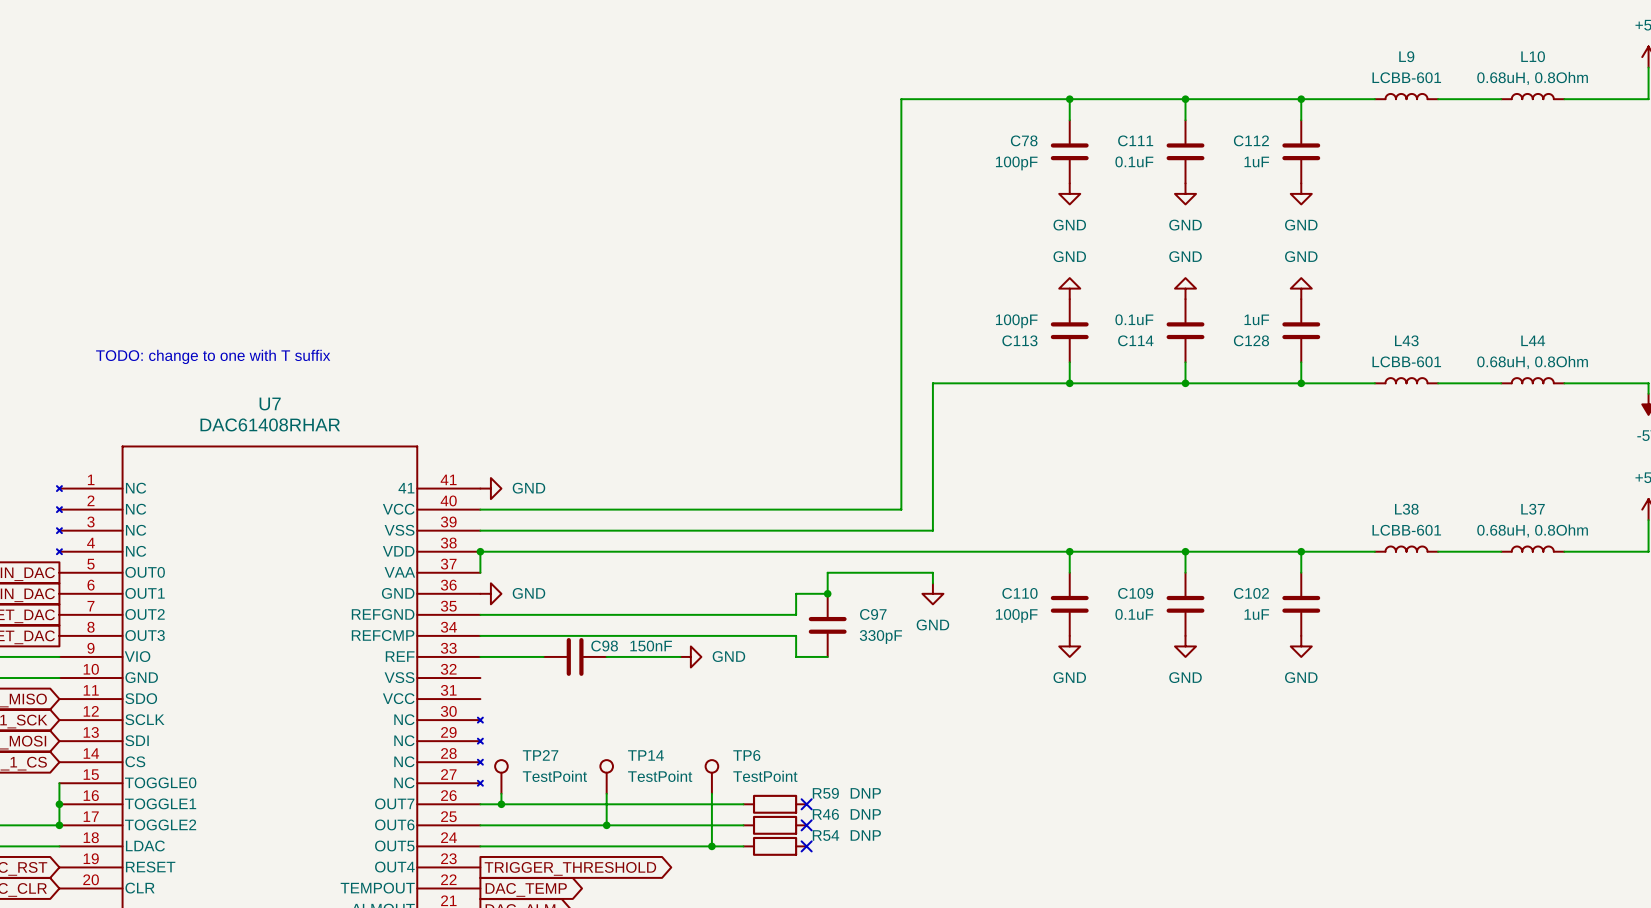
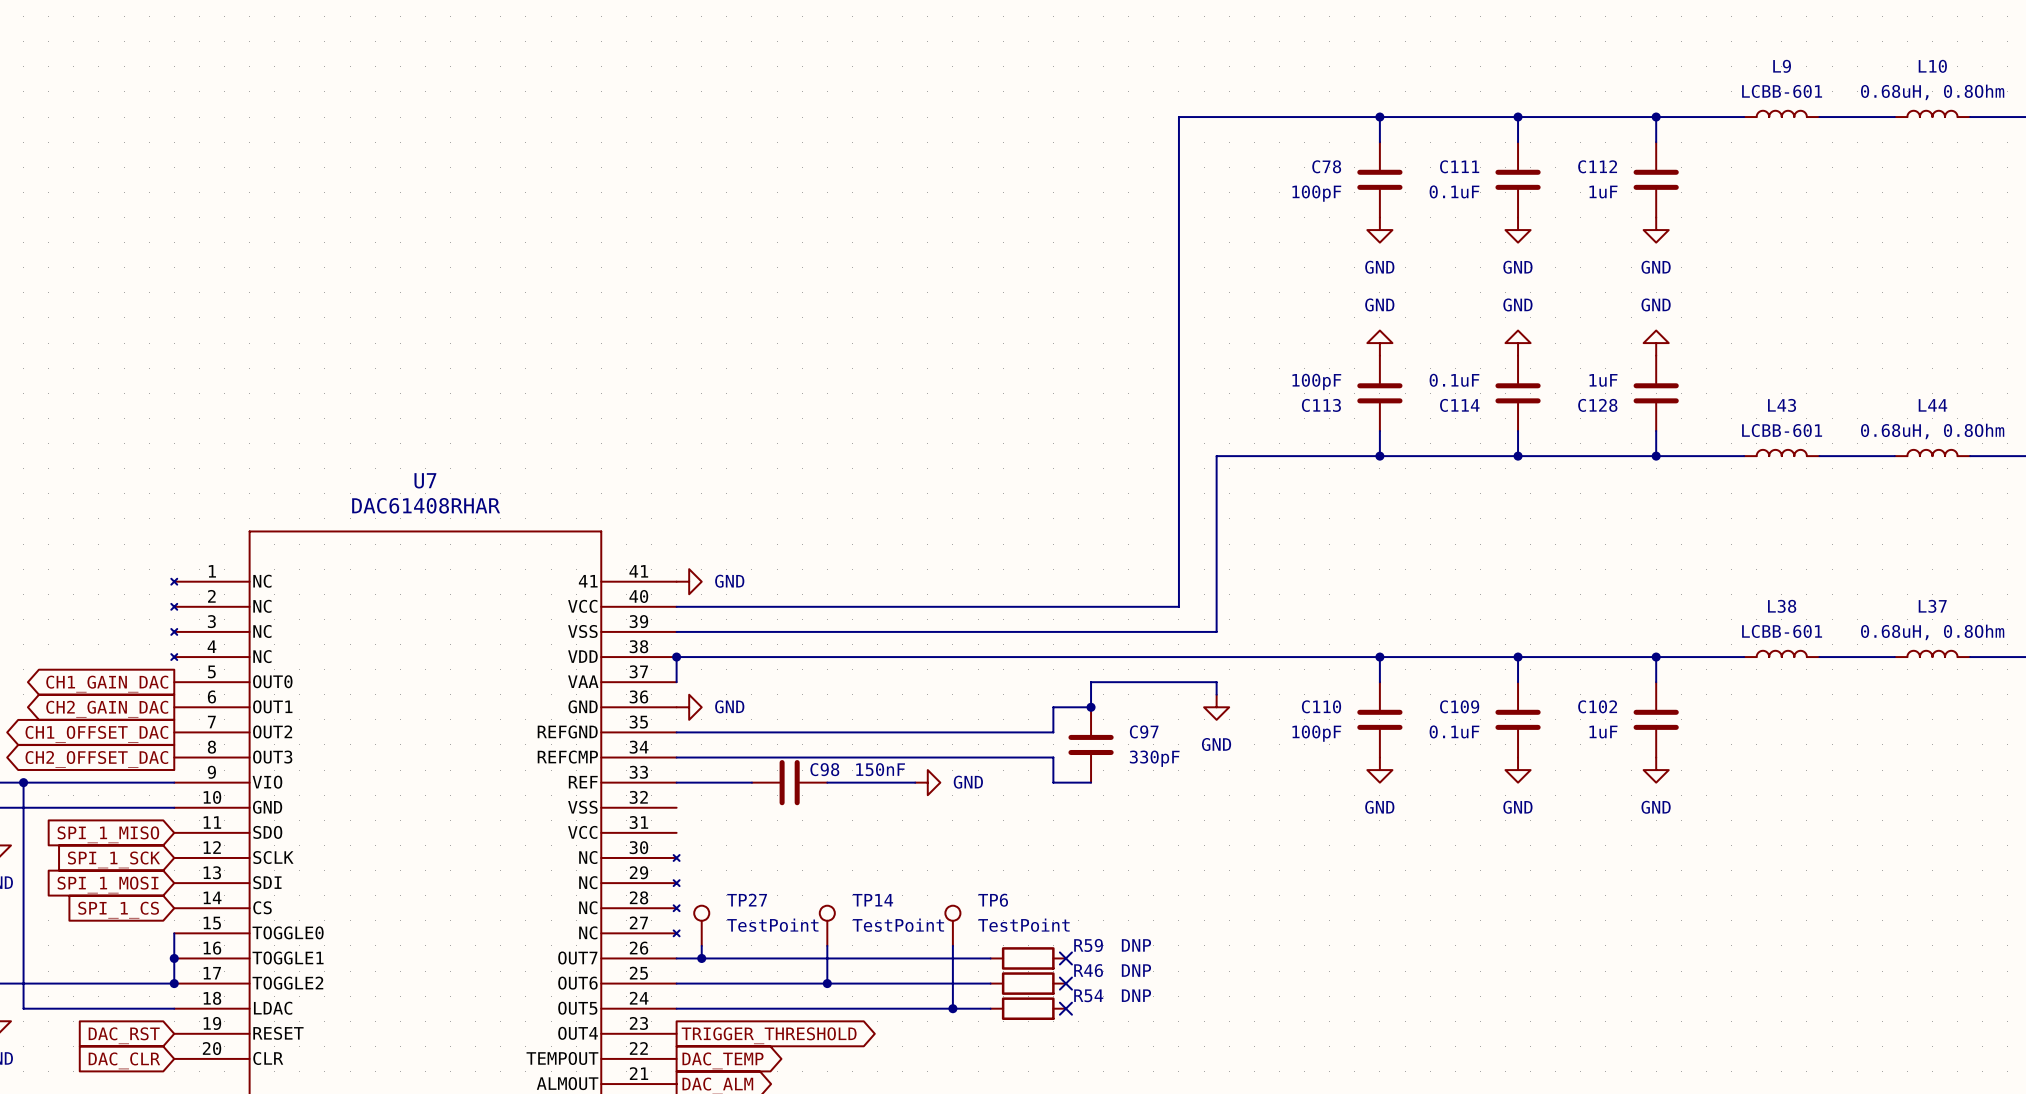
text: TODO: change to one with T suffix (213, 356) -> none

